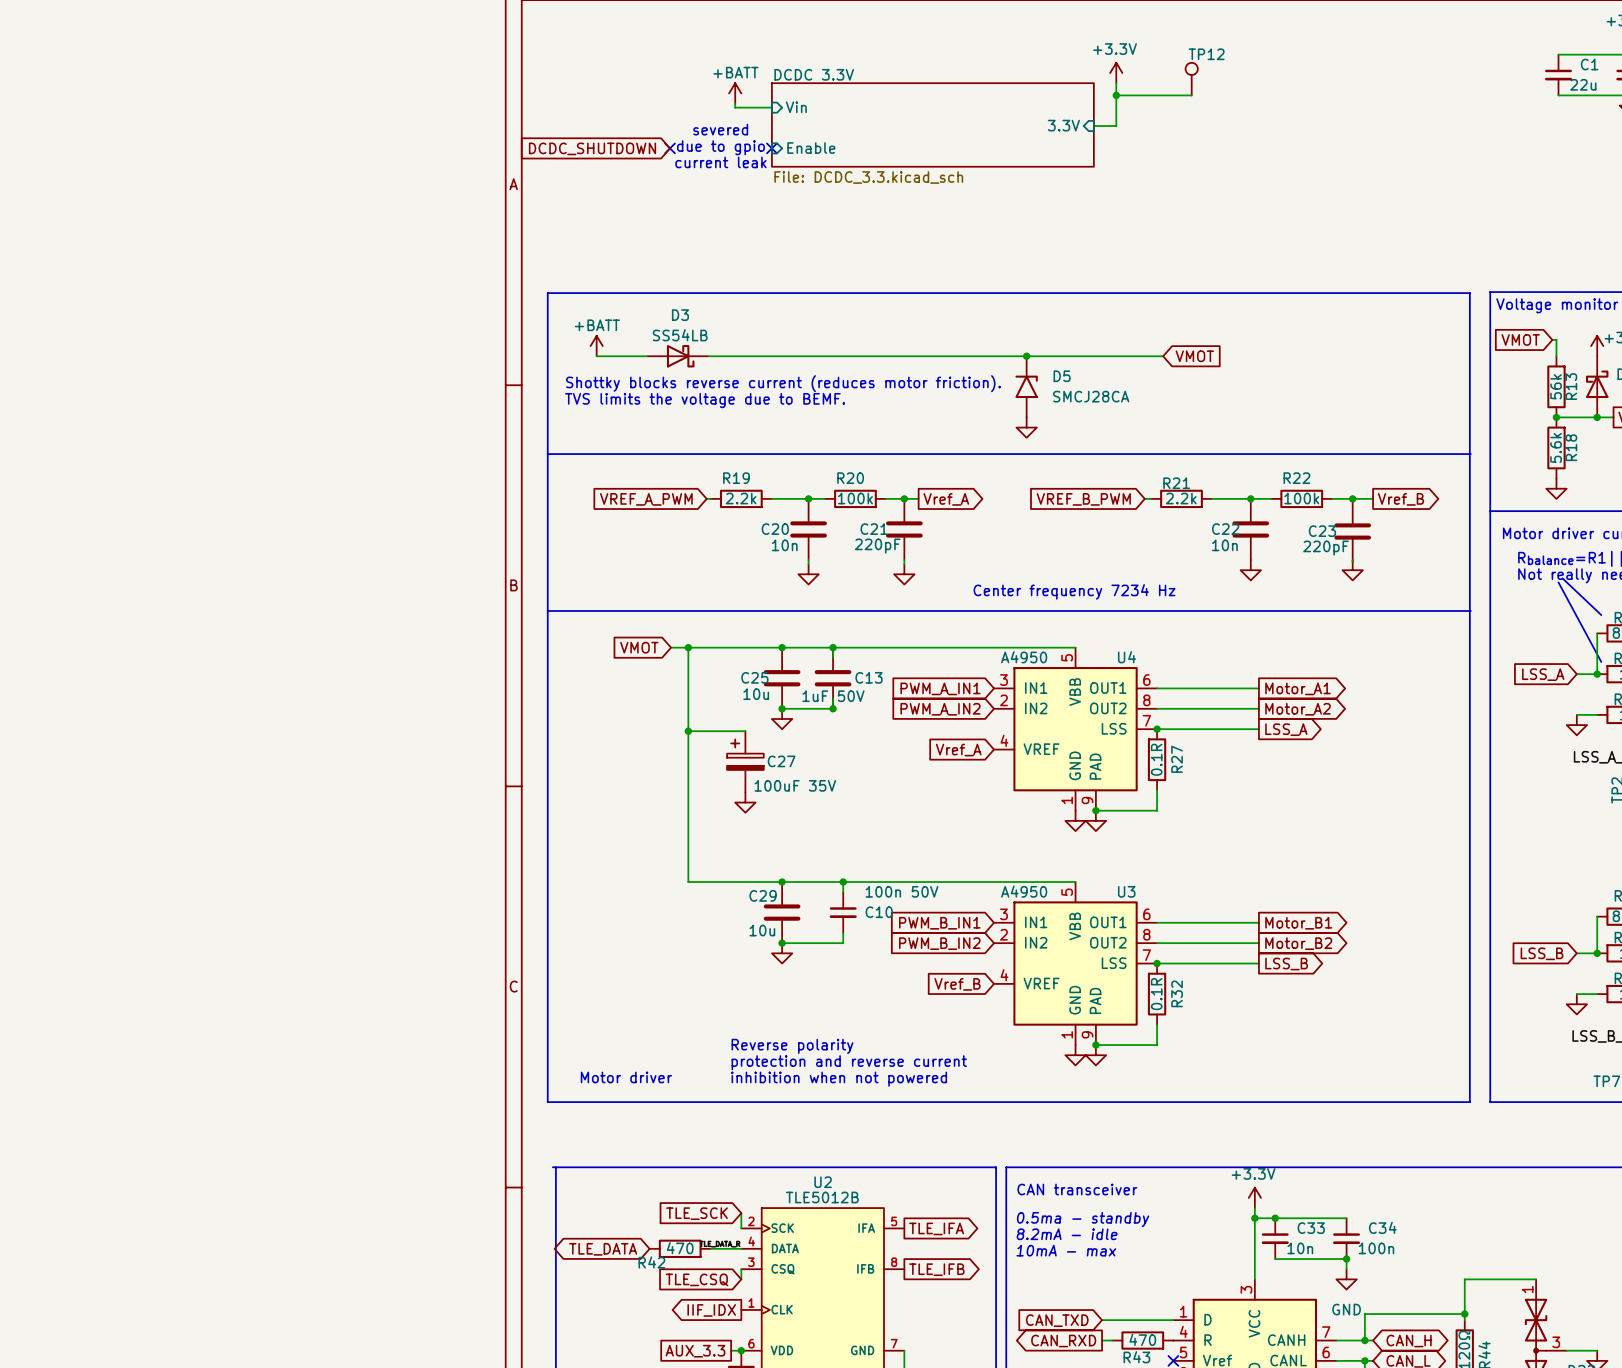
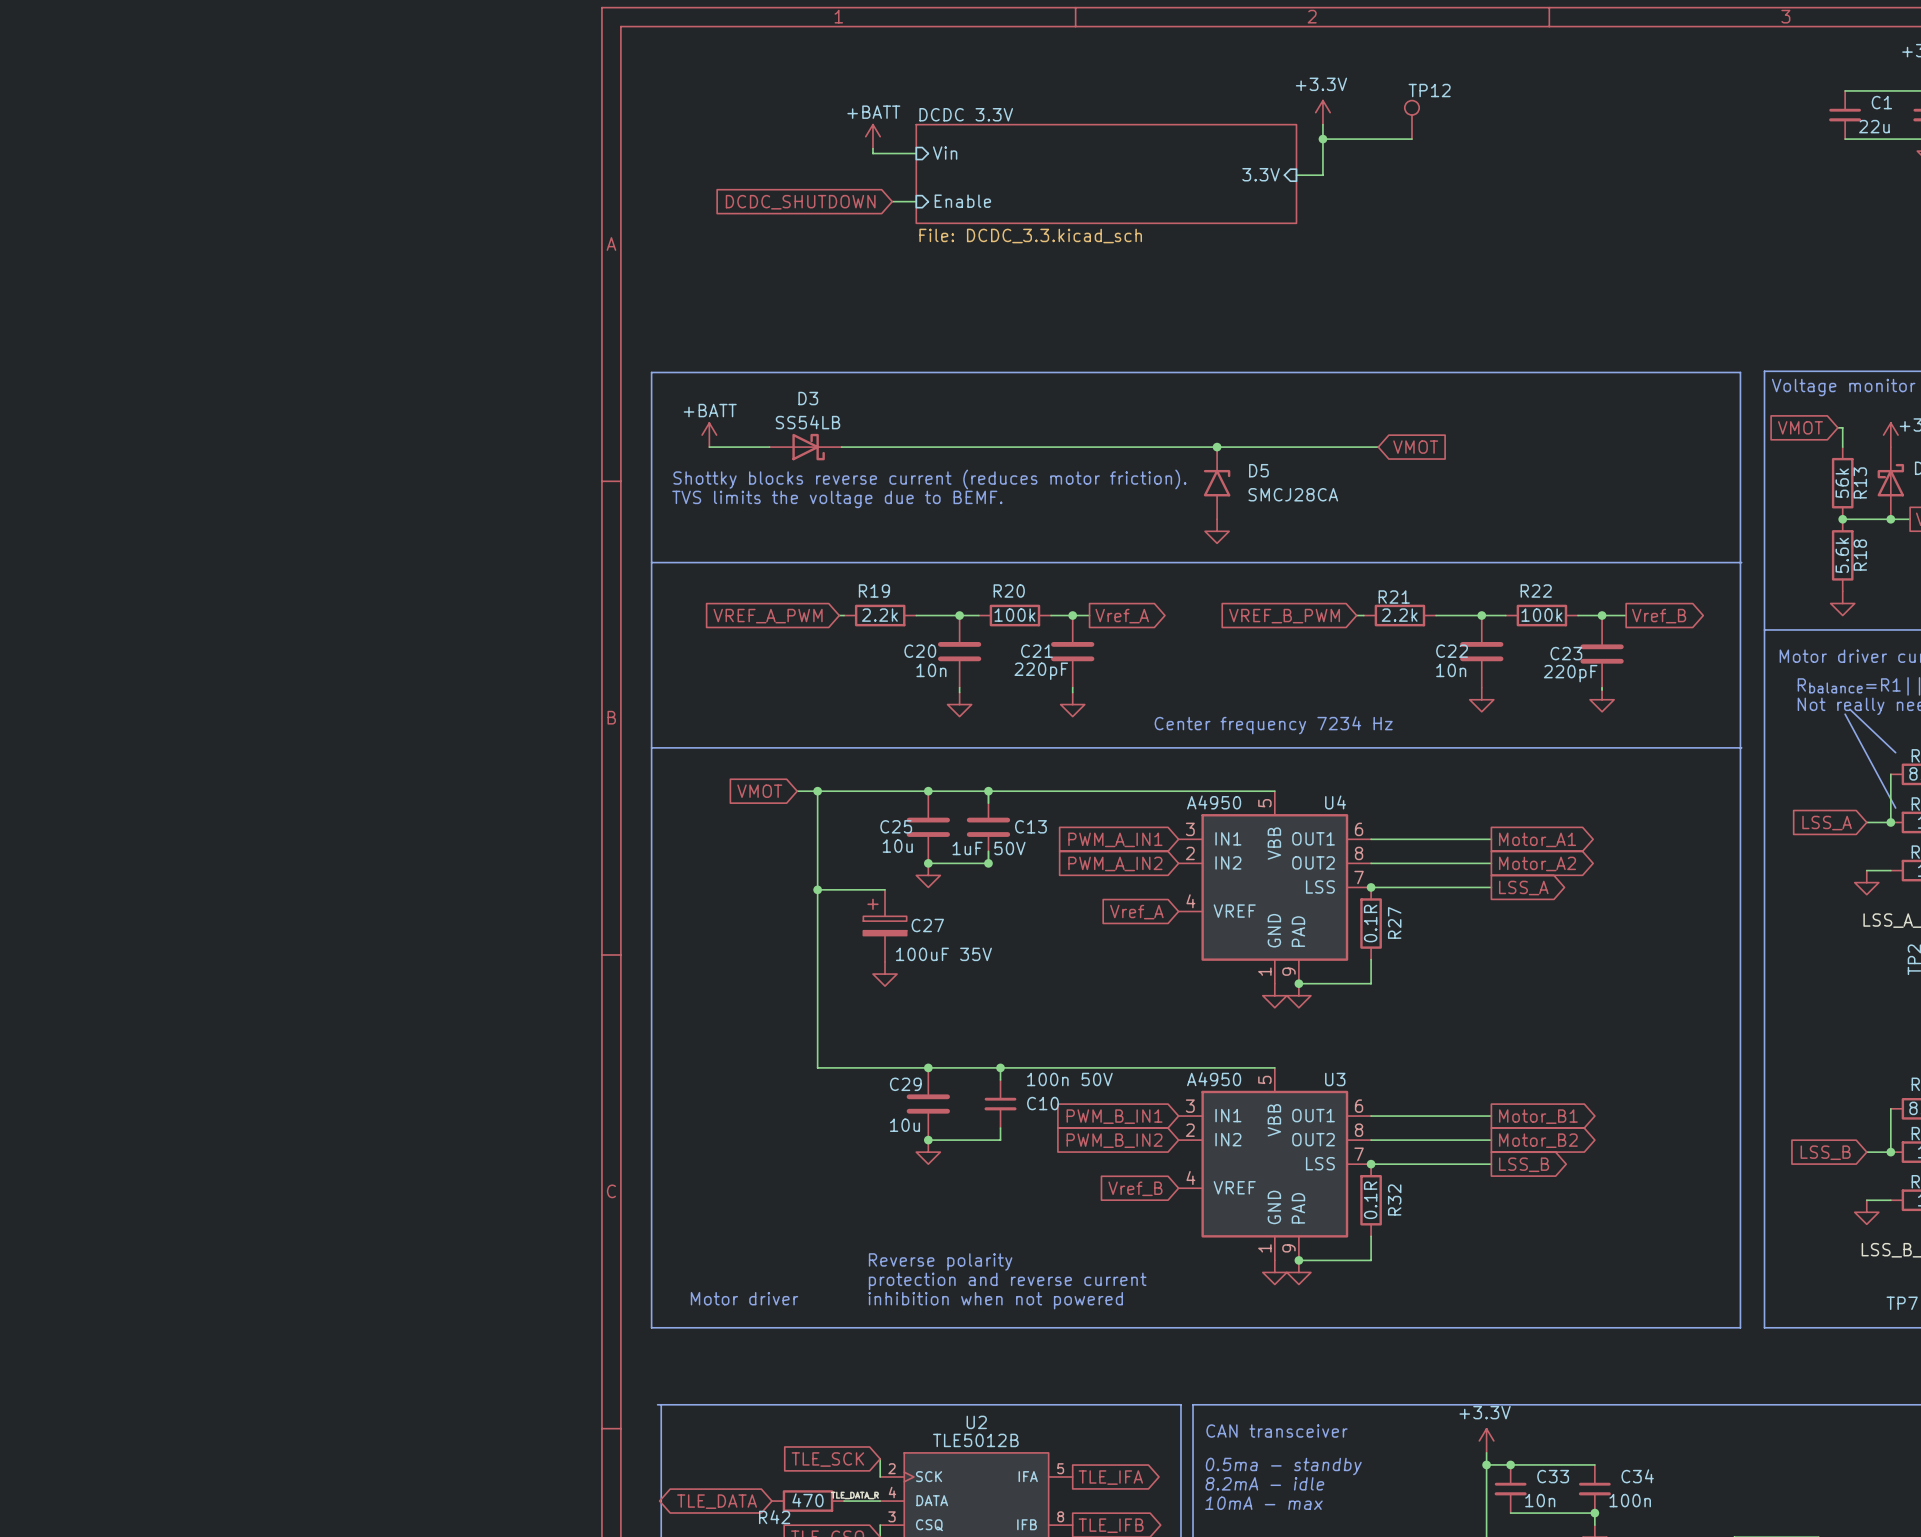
text: severed (720, 129) -> none
text: due to gpio (720, 147) -> none
global label position: DCDC_SHUTDOWN (592, 148) -> DCDC_SHUTDOWN (800, 202)
no-connect mark: (670, 148) -> none
wire: none -> (892, 201) (916, 201)
no-connect mark: (771, 148) -> none
text: current leak (720, 162) -> none

